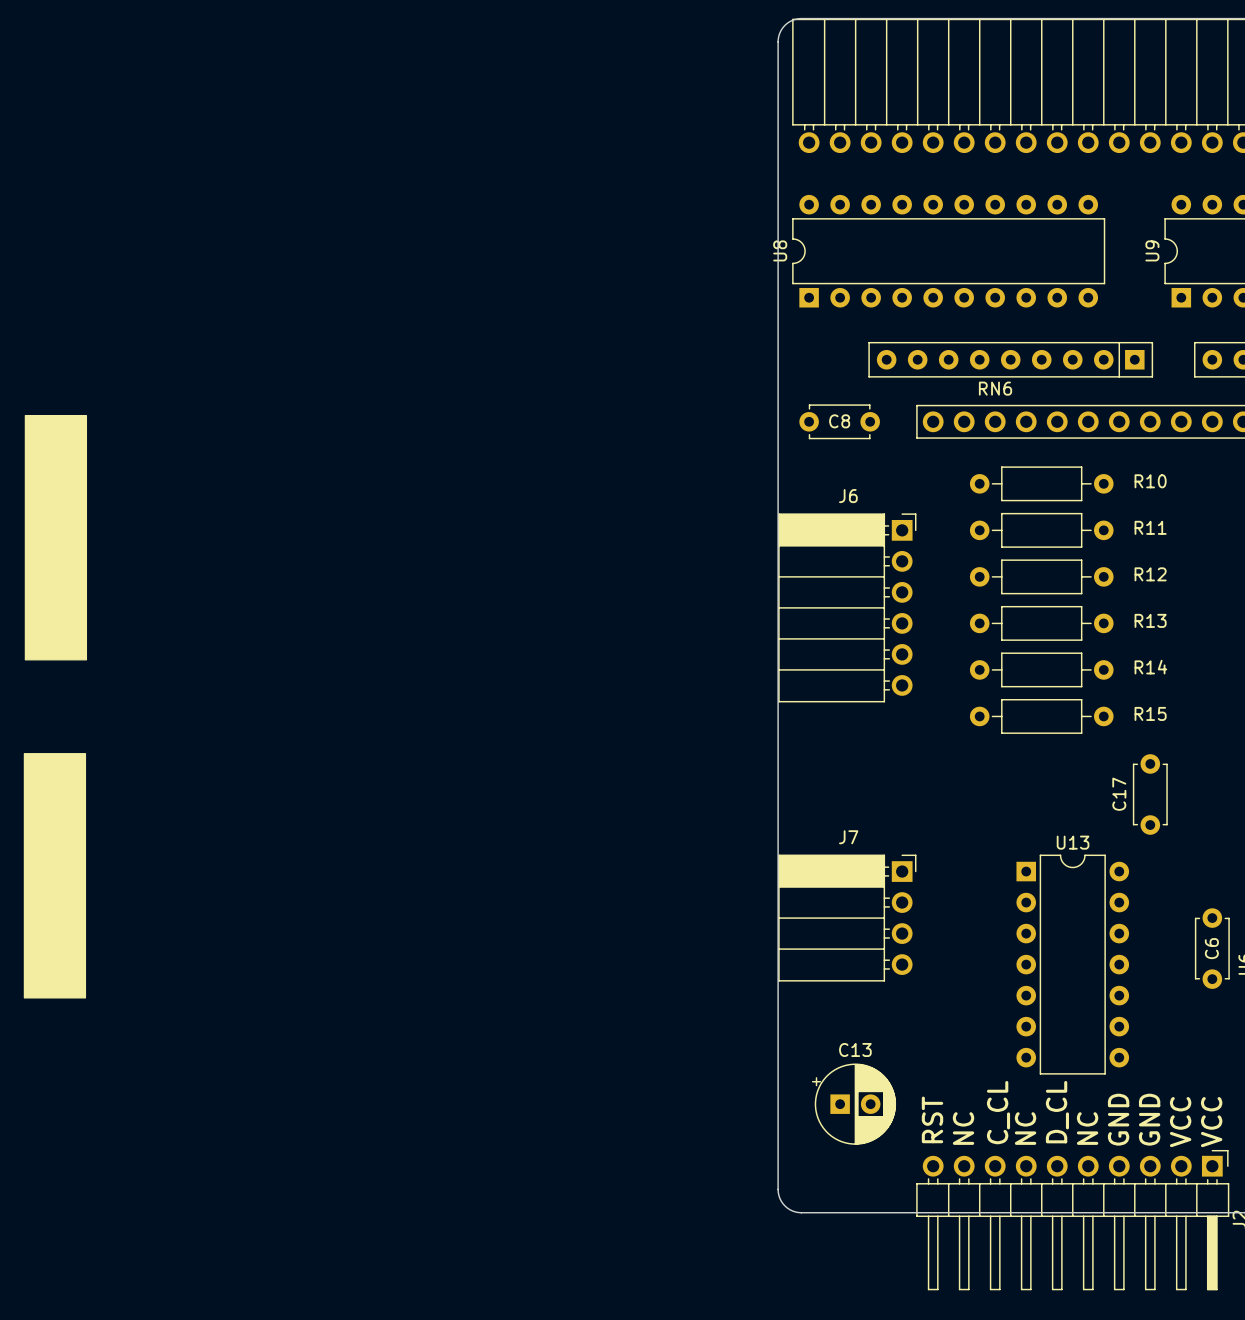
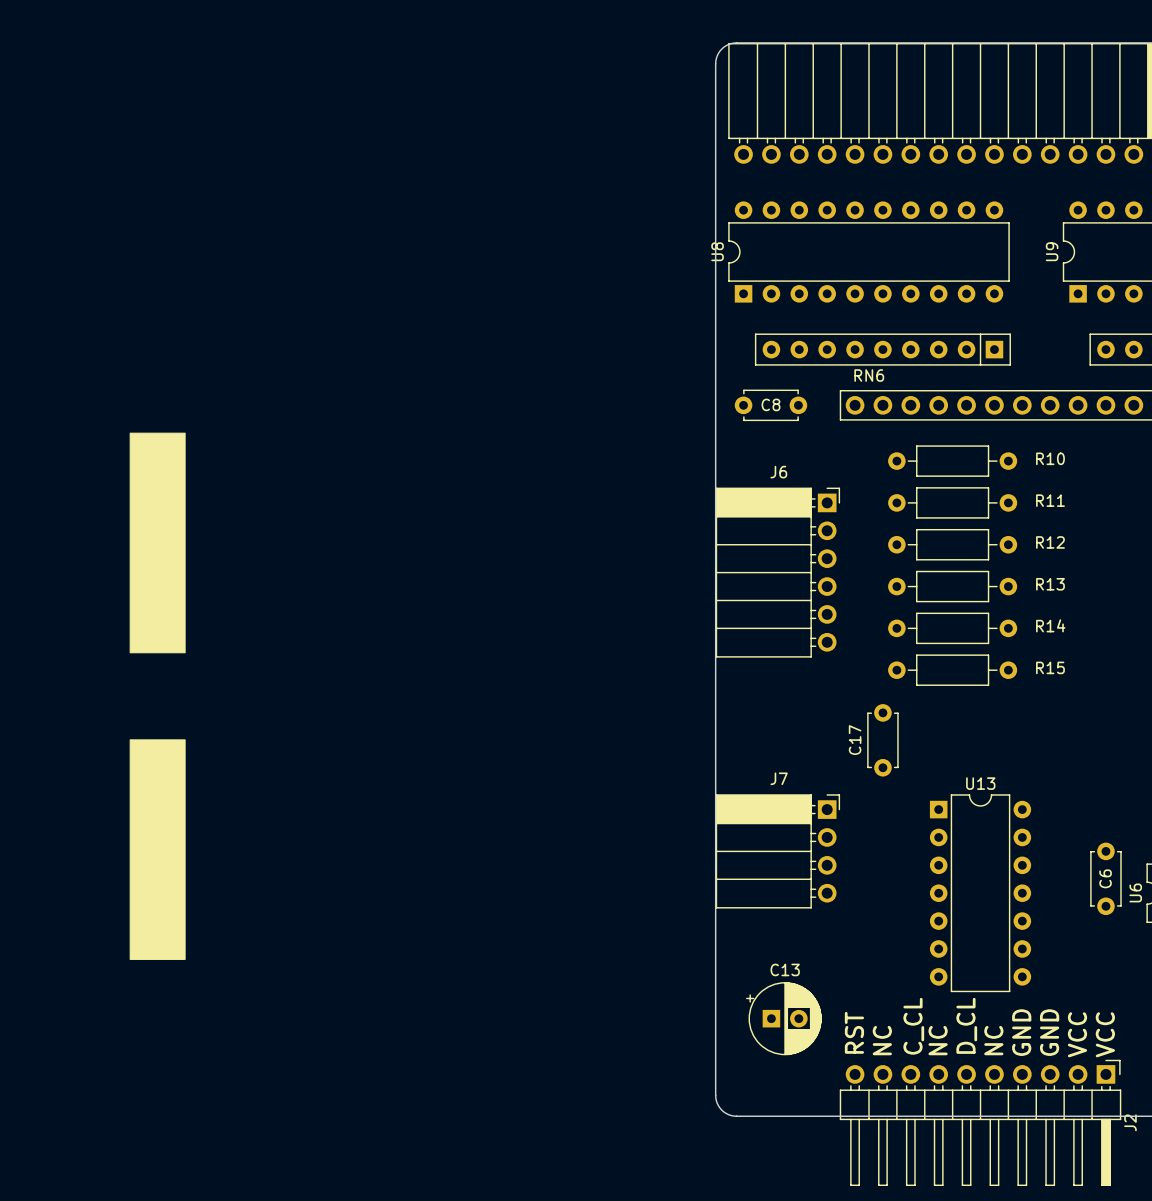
RN6 position: (1010, 359) -> (882, 349)
drawing position: (55, 537) -> (157, 542)
C17 position: (1150, 794) -> (882, 740)
drawing position: (54, 875) -> (157, 849)

